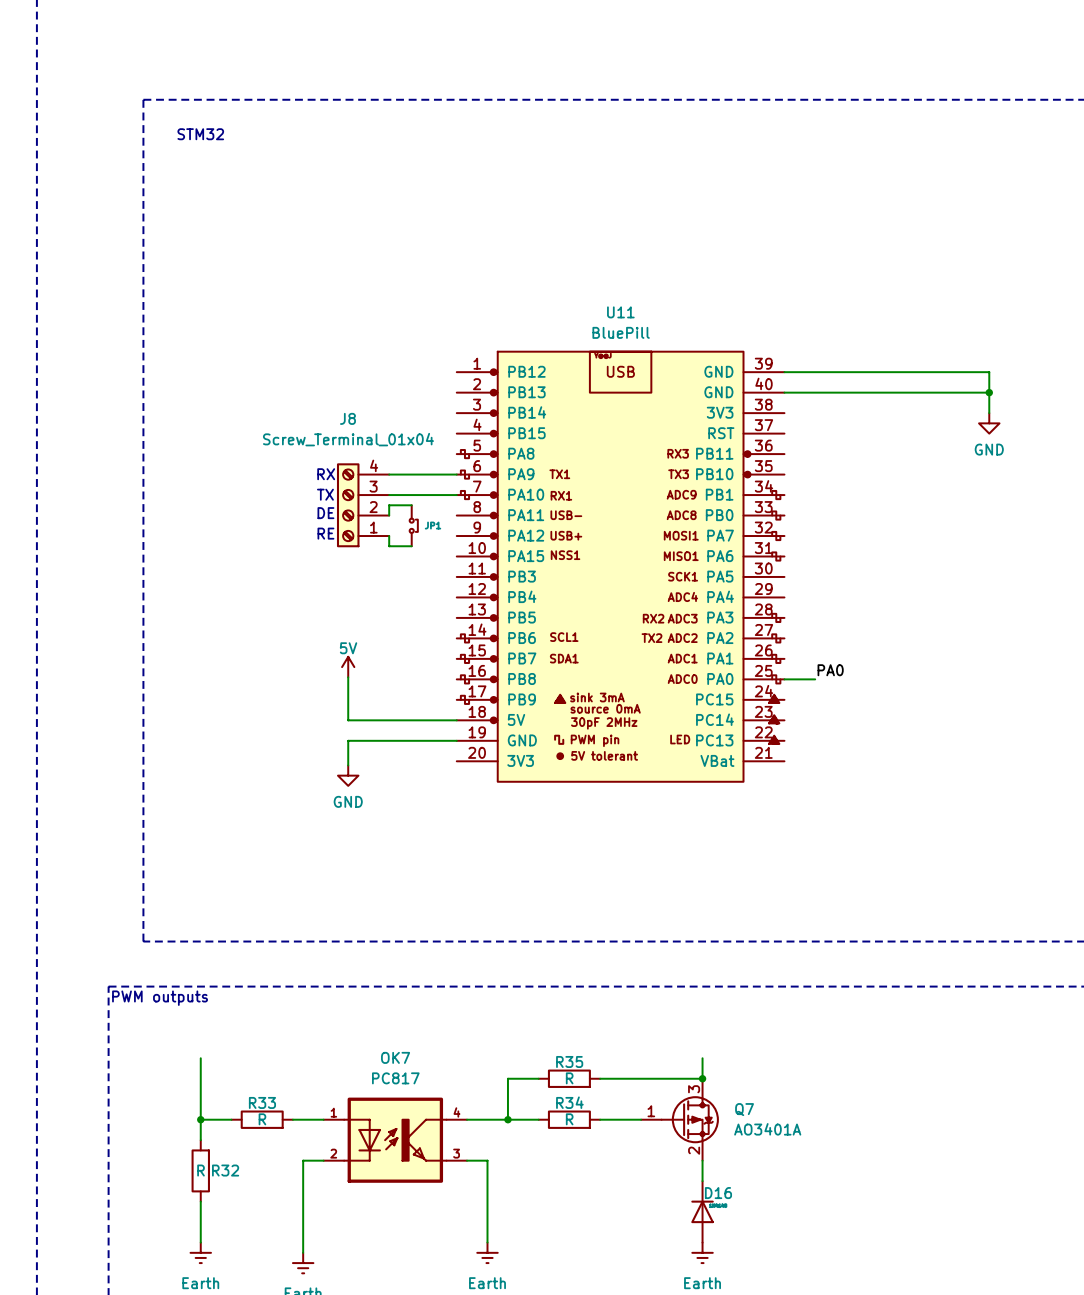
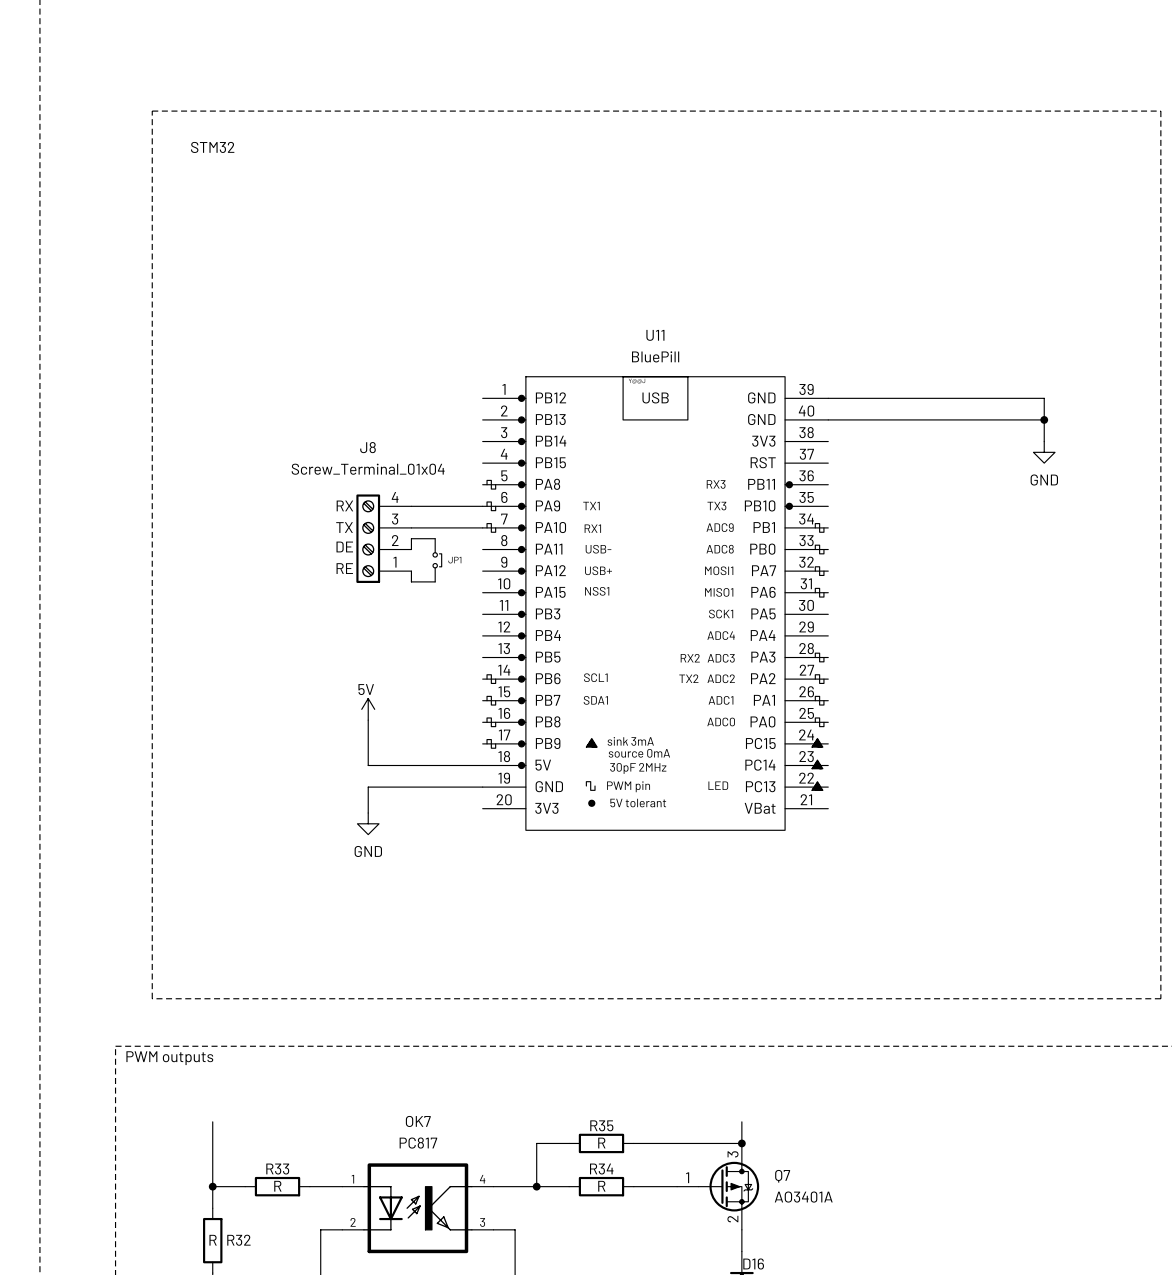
label: PA0 (830, 670) -> none
wire: (784, 679) (815, 679) -> none

